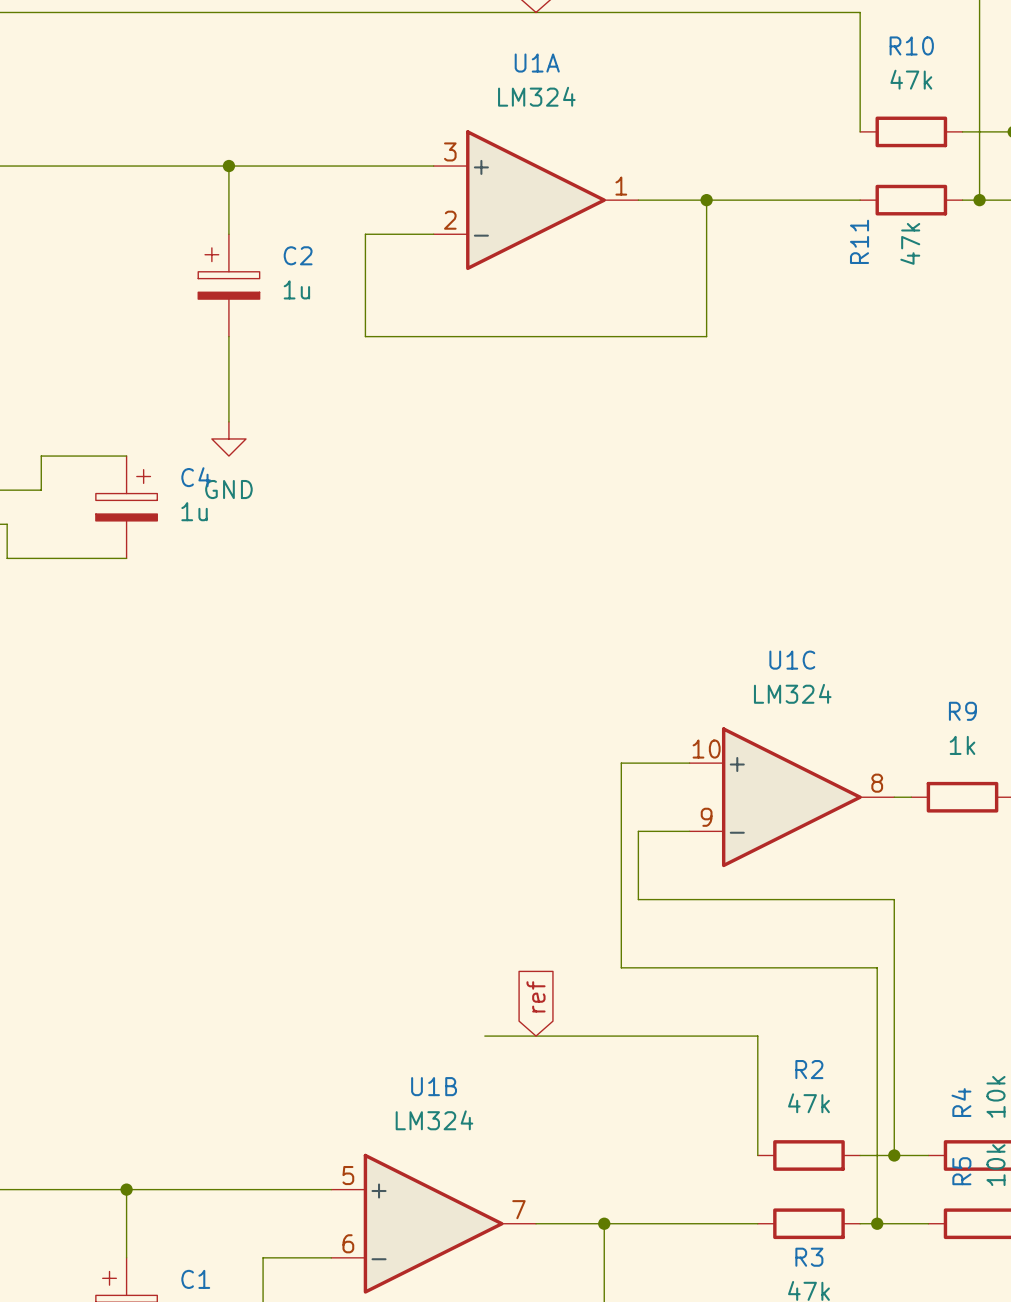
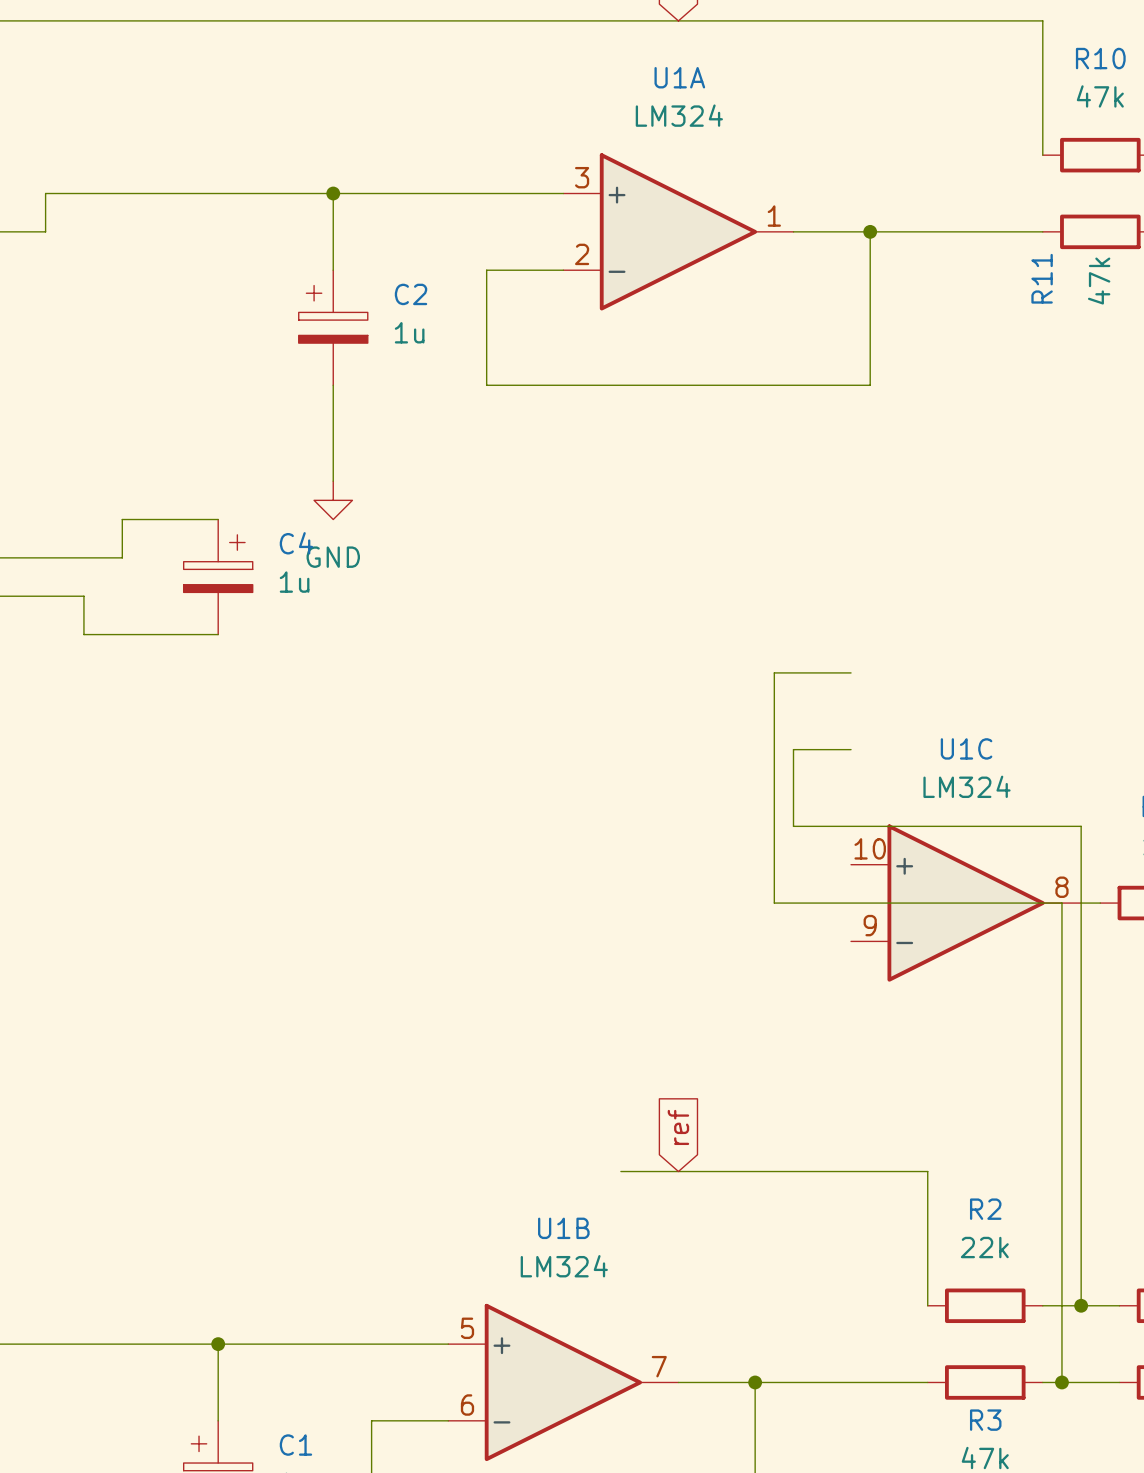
wire: (621, 763) (689, 763) -> (774, 864) (774, 672) (851, 672)
wire: (621, 797) (621, 967) (877, 967) -> (774, 903) (1061, 903) (1061, 1094)
wire: (689, 831) (638, 831) (638, 899) (894, 899) -> (851, 749) (793, 749) (793, 826) (1081, 826) (1081, 1018)
R2 value: 47k (808, 1103) -> 22k (984, 1247)

